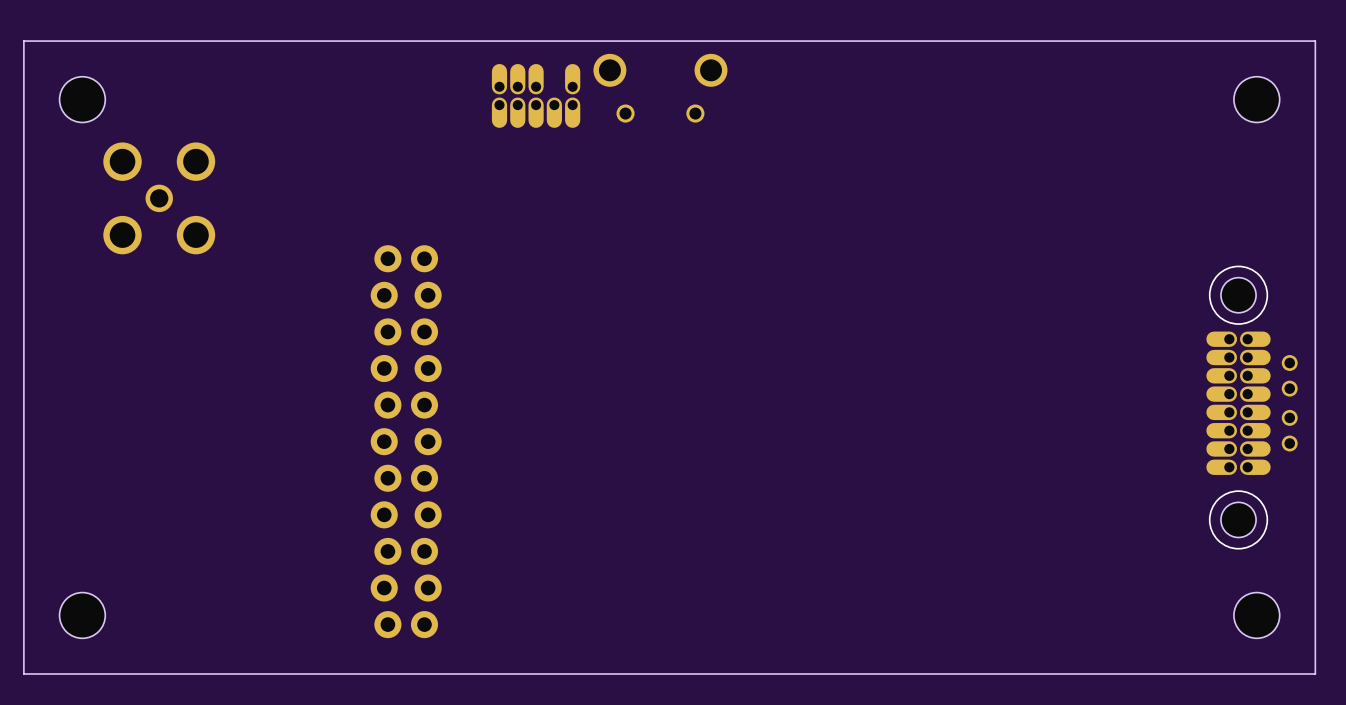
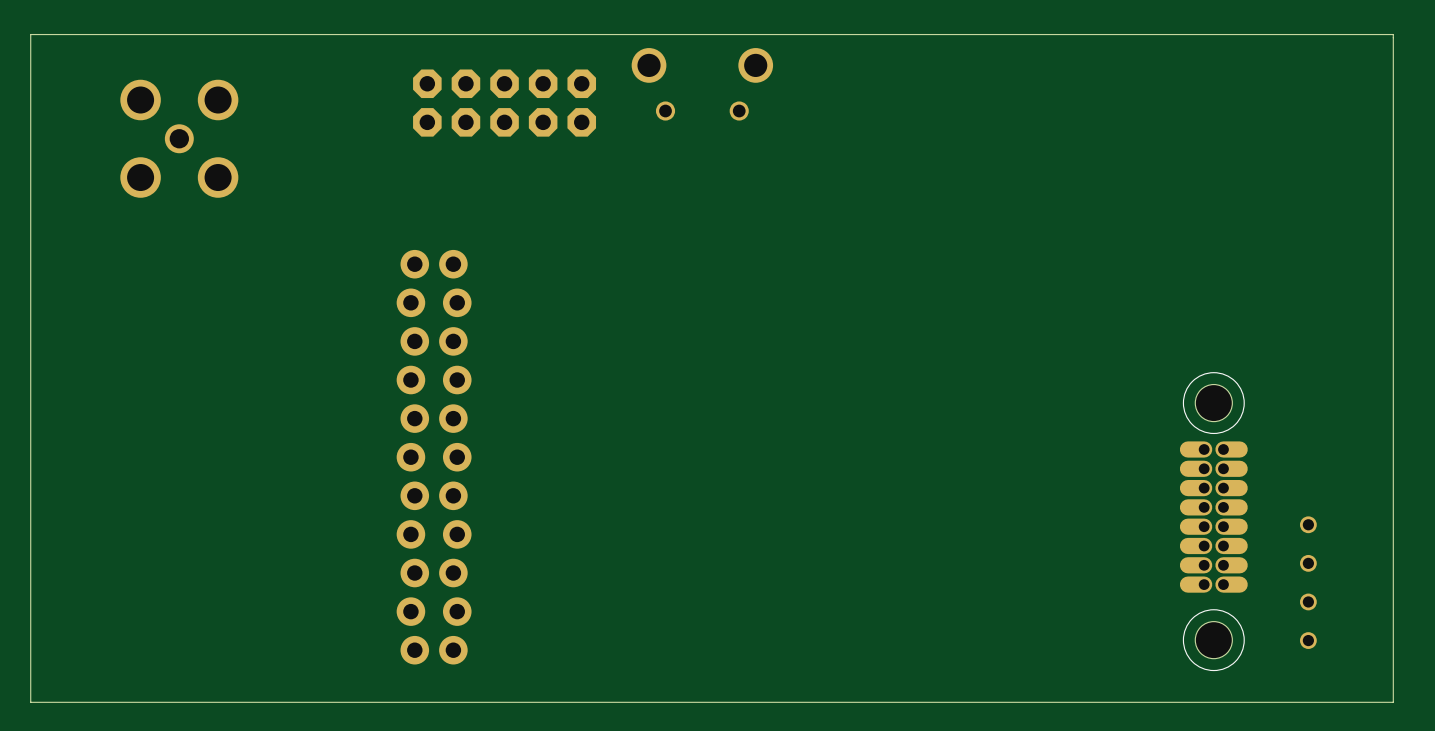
part: (536, 95) -> none
part: (82, 99) -> none
part: (1256, 99) -> none
part: none -> (504, 103)
part position: (159, 198) -> (179, 138)
part: (1289, 363) -> none
part: (1289, 388) -> none
part position: (1238, 407) -> (1213, 521)
part: (1289, 417) -> none
part: (1289, 443) -> none
part: none -> (1308, 524)
part: none -> (1308, 563)
part: none -> (1308, 601)
part: (82, 615) -> none
part: none -> (1308, 640)
part: (1256, 615) -> none

